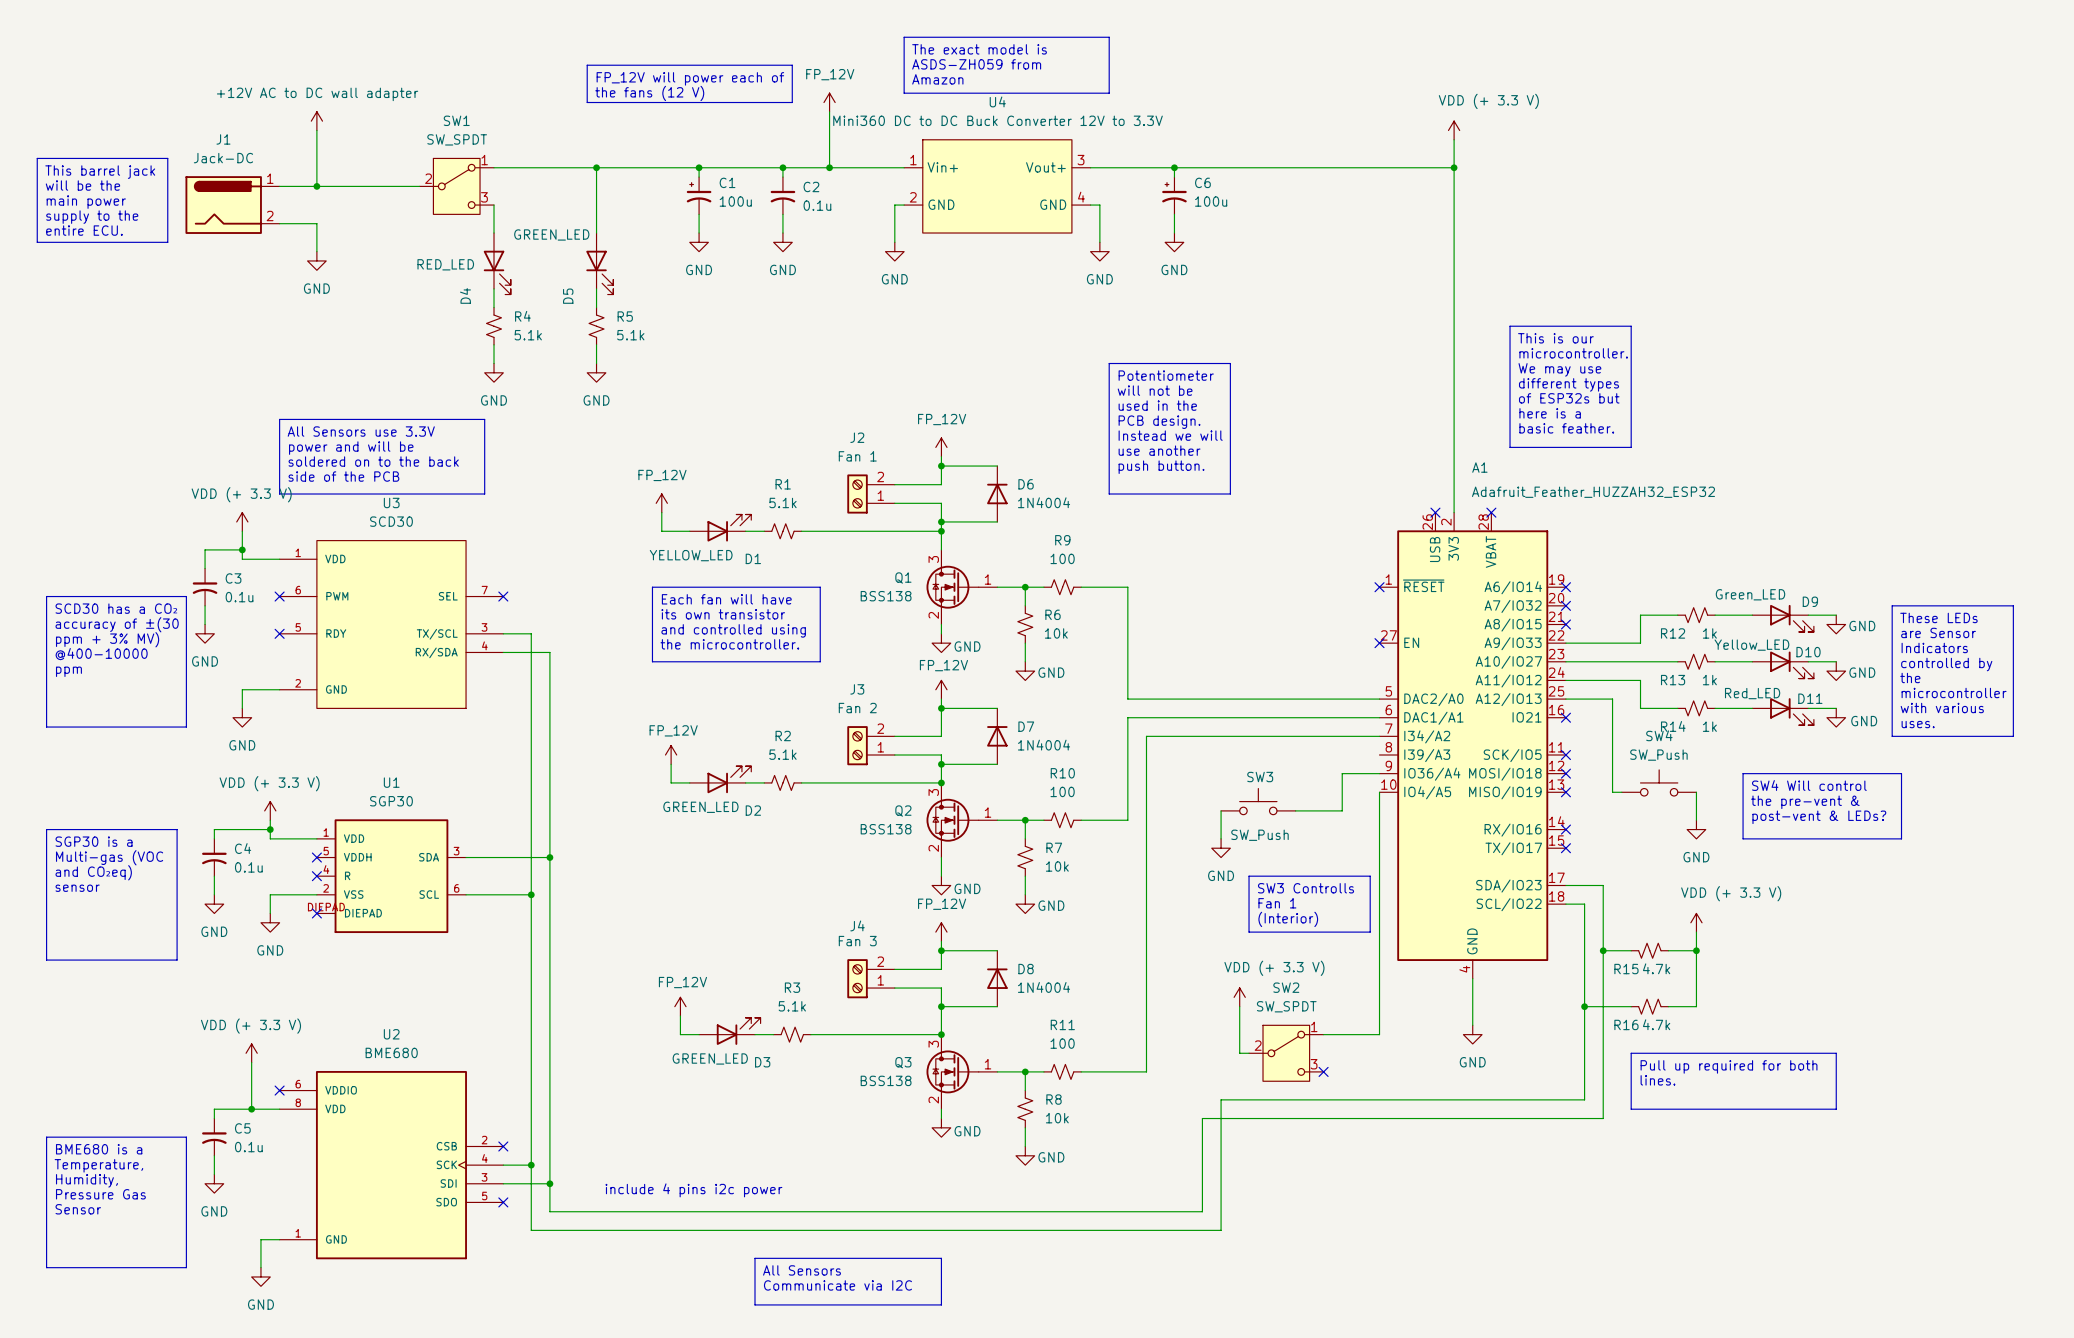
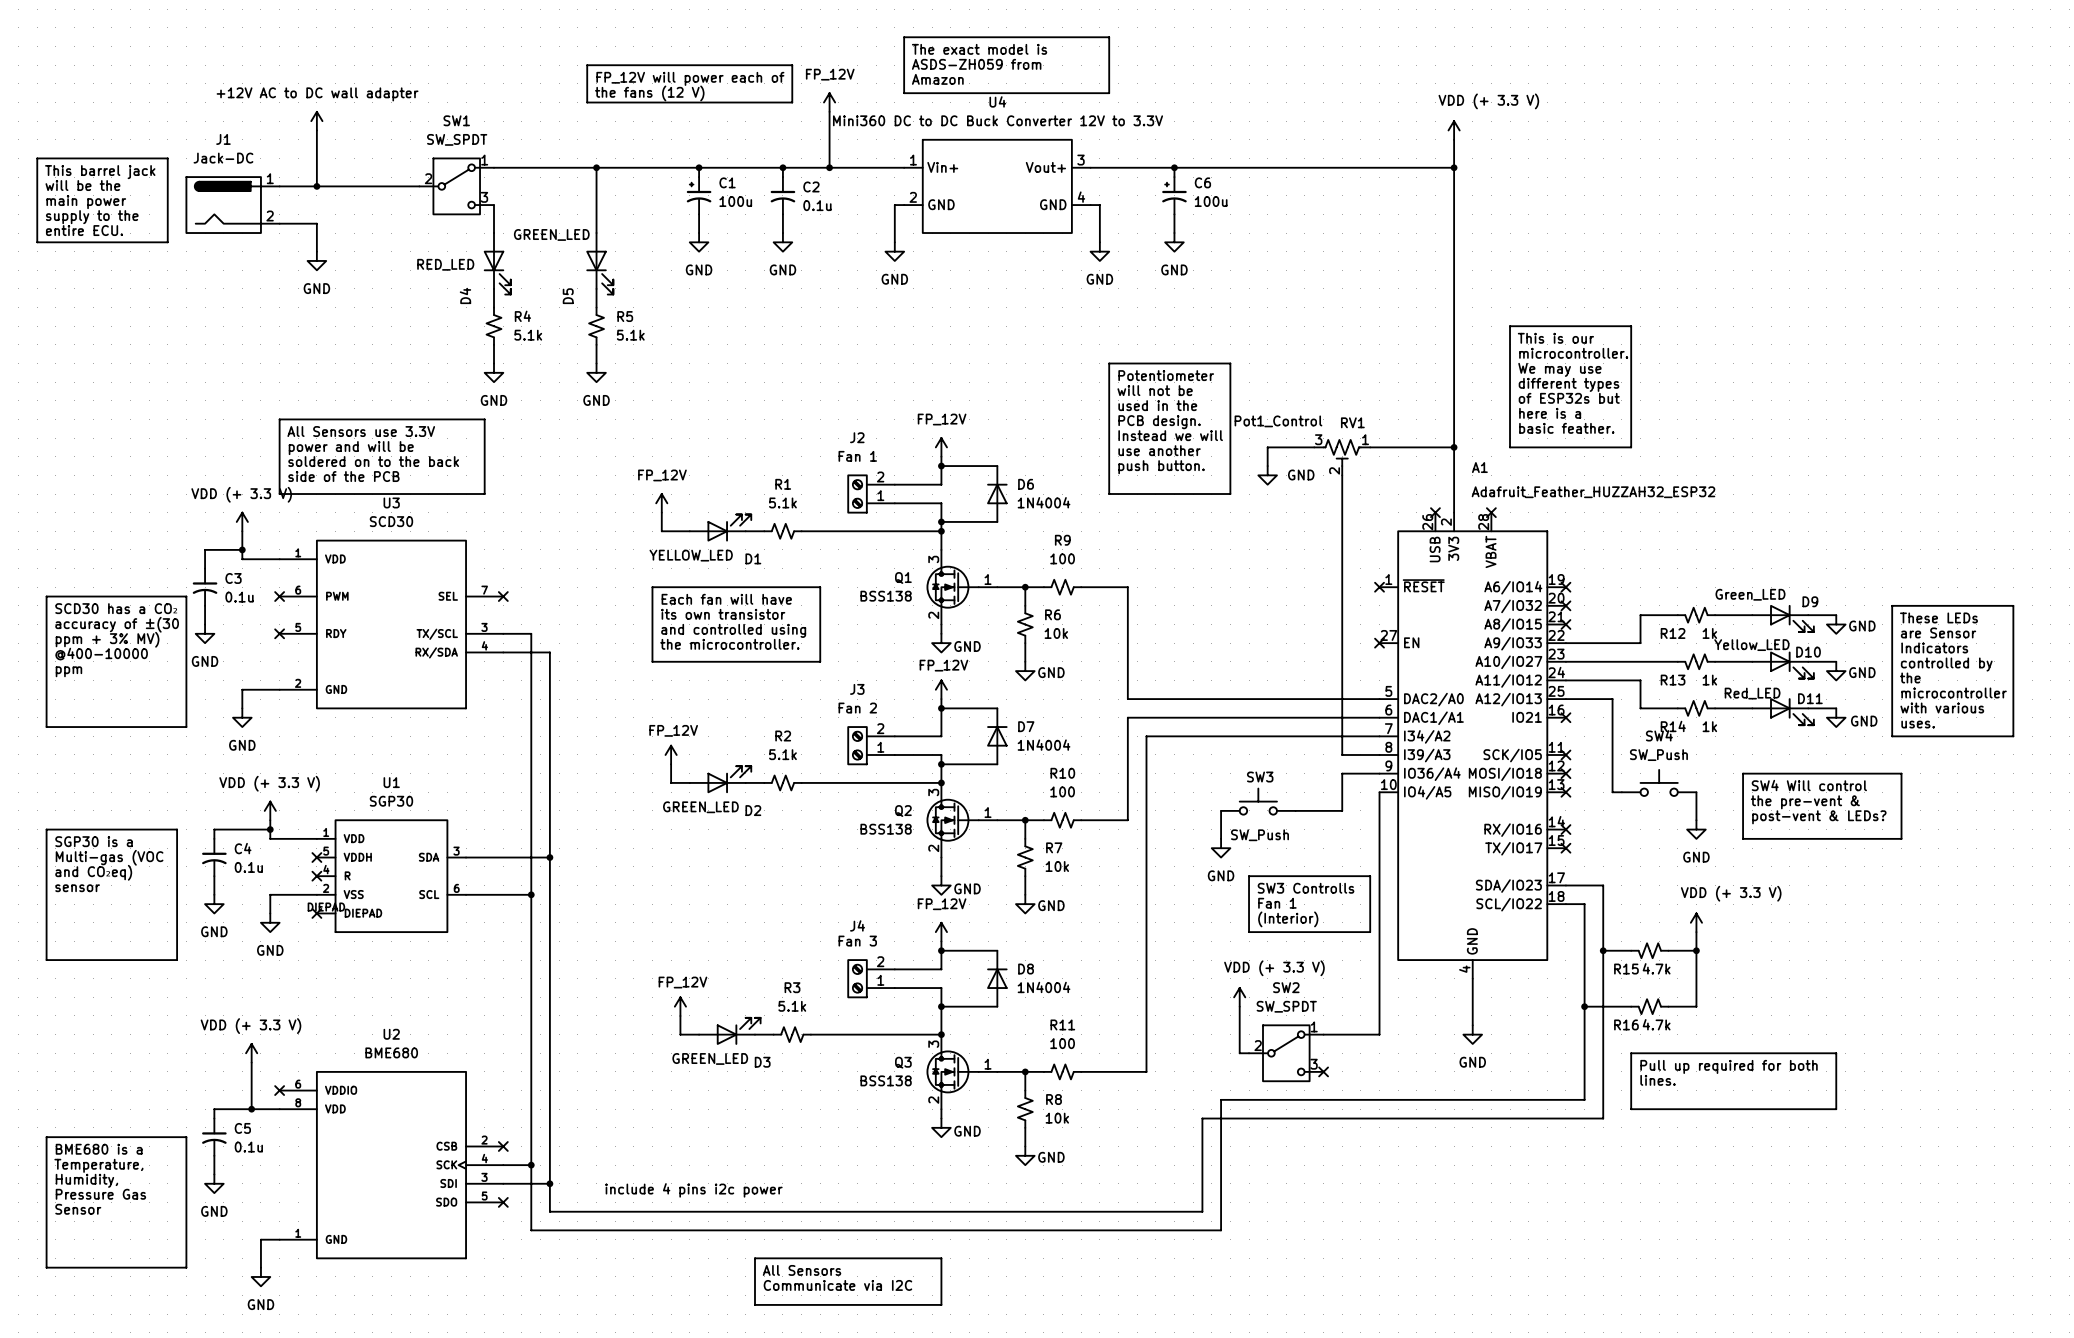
wire: none -> (1314, 447) (1267, 447) (1267, 466)
wire: none -> (1370, 447) (1454, 447)
junction: none -> (1454, 447)
RV1: none -> Pot1_Control (1342, 457)
power symbol: none -> GND (1267, 475)
wire: none -> (1342, 475) (1342, 754) (1379, 754)

